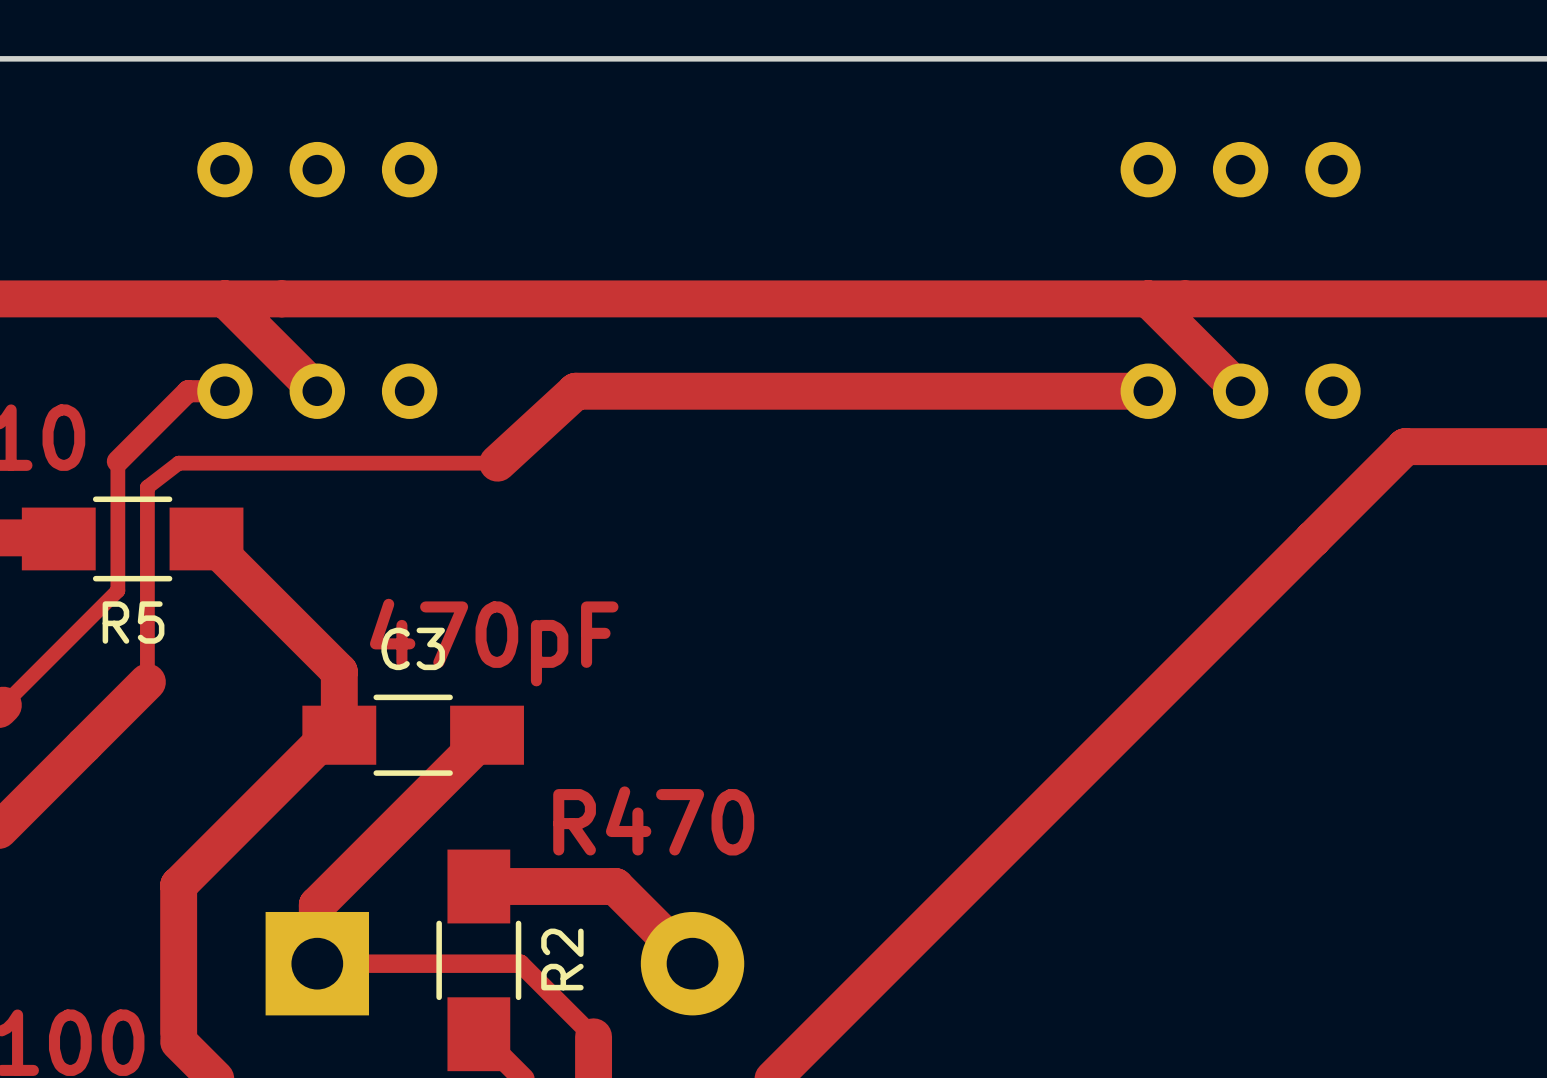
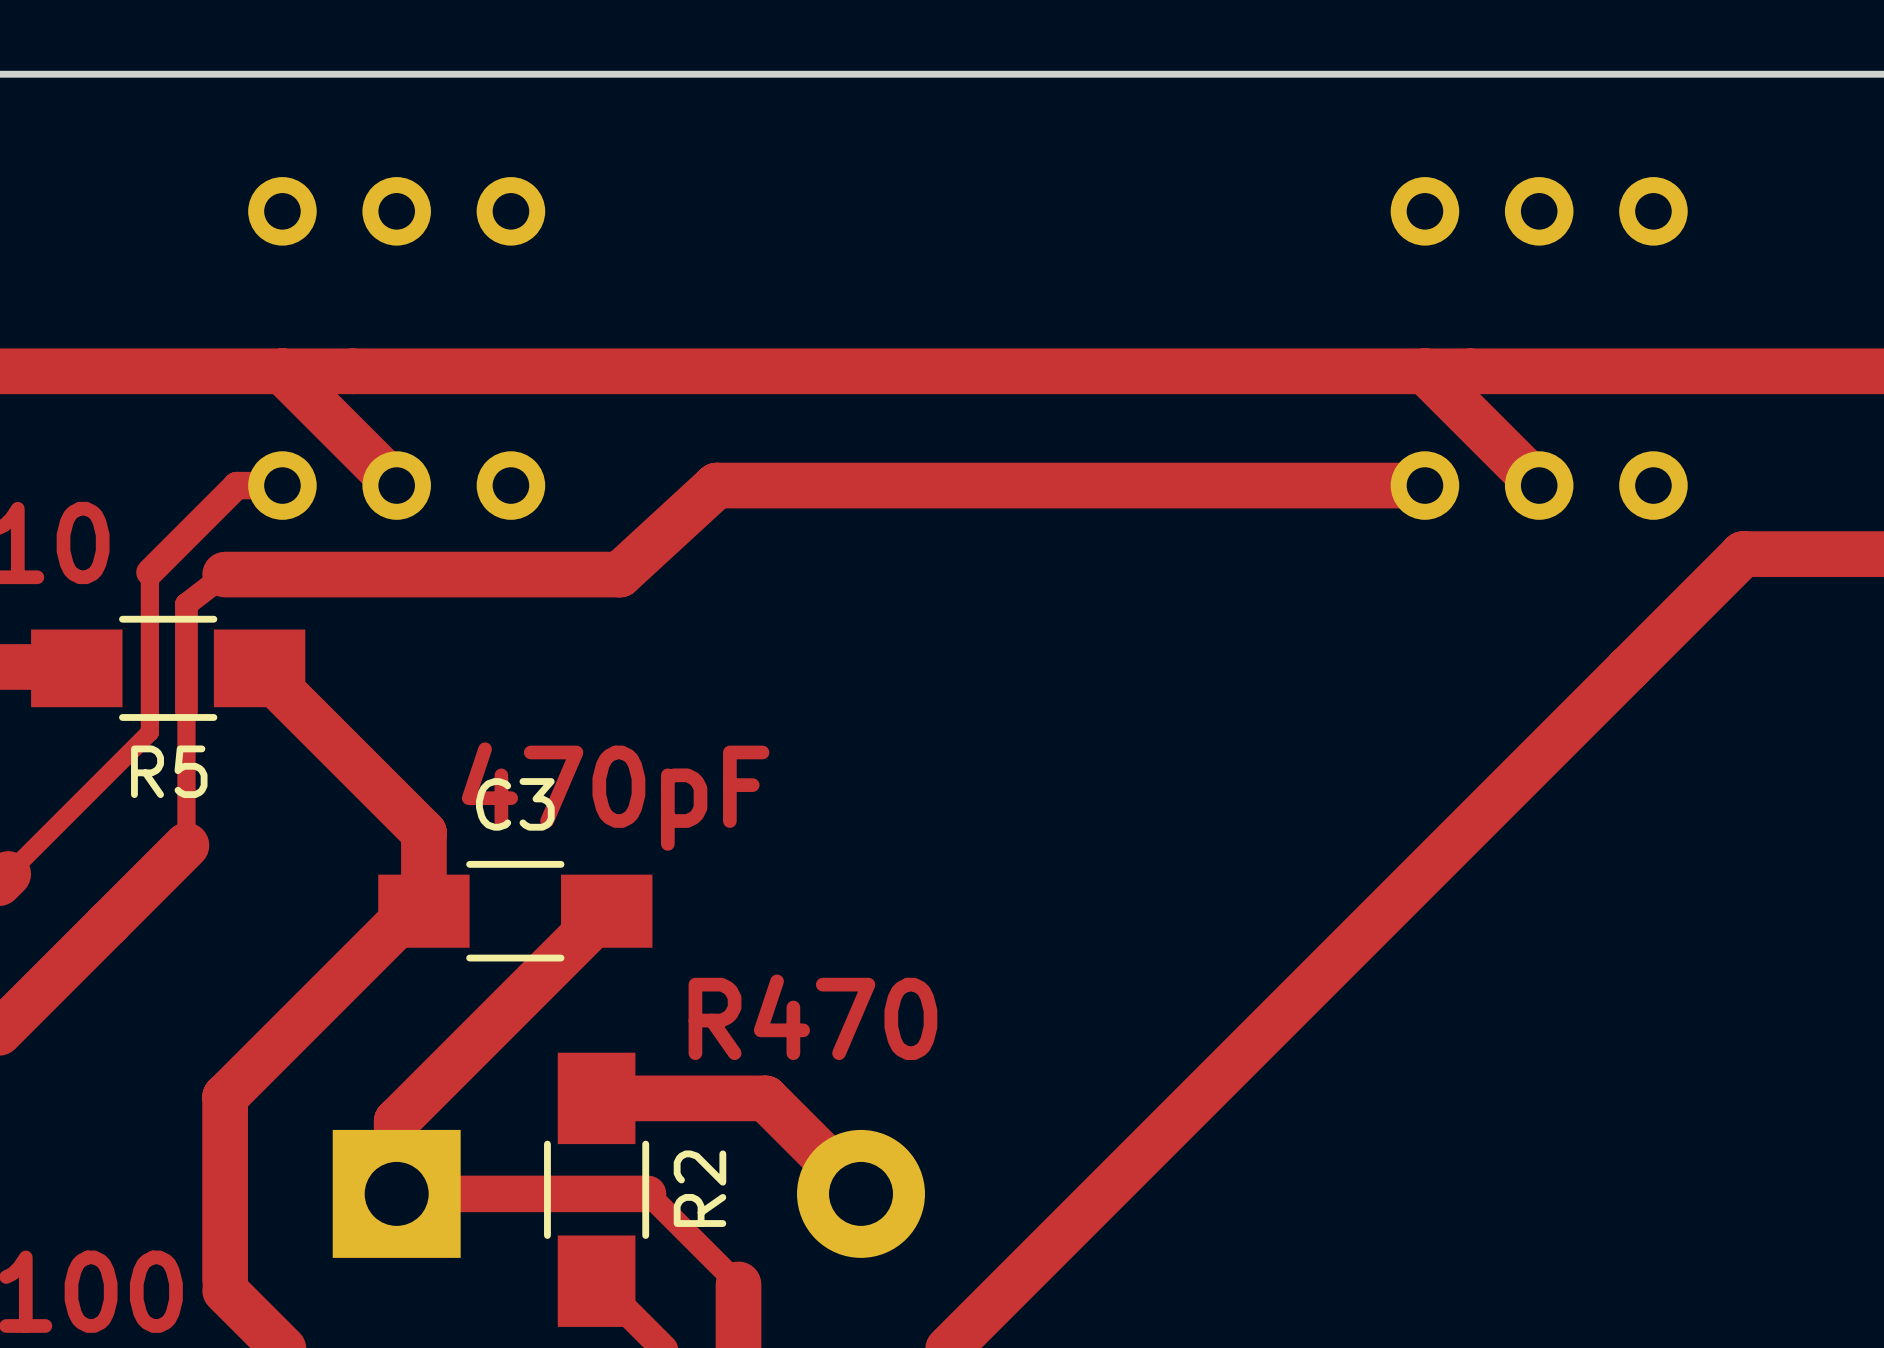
track width: thin (497, 463) (178, 463) (147, 487) (147, 574) -> thick (619, 574) (225, 574) (186, 604) (186, 711)
track width: thin (317, 963) (520, 963) -> thick (396, 1193) (648, 1193)

